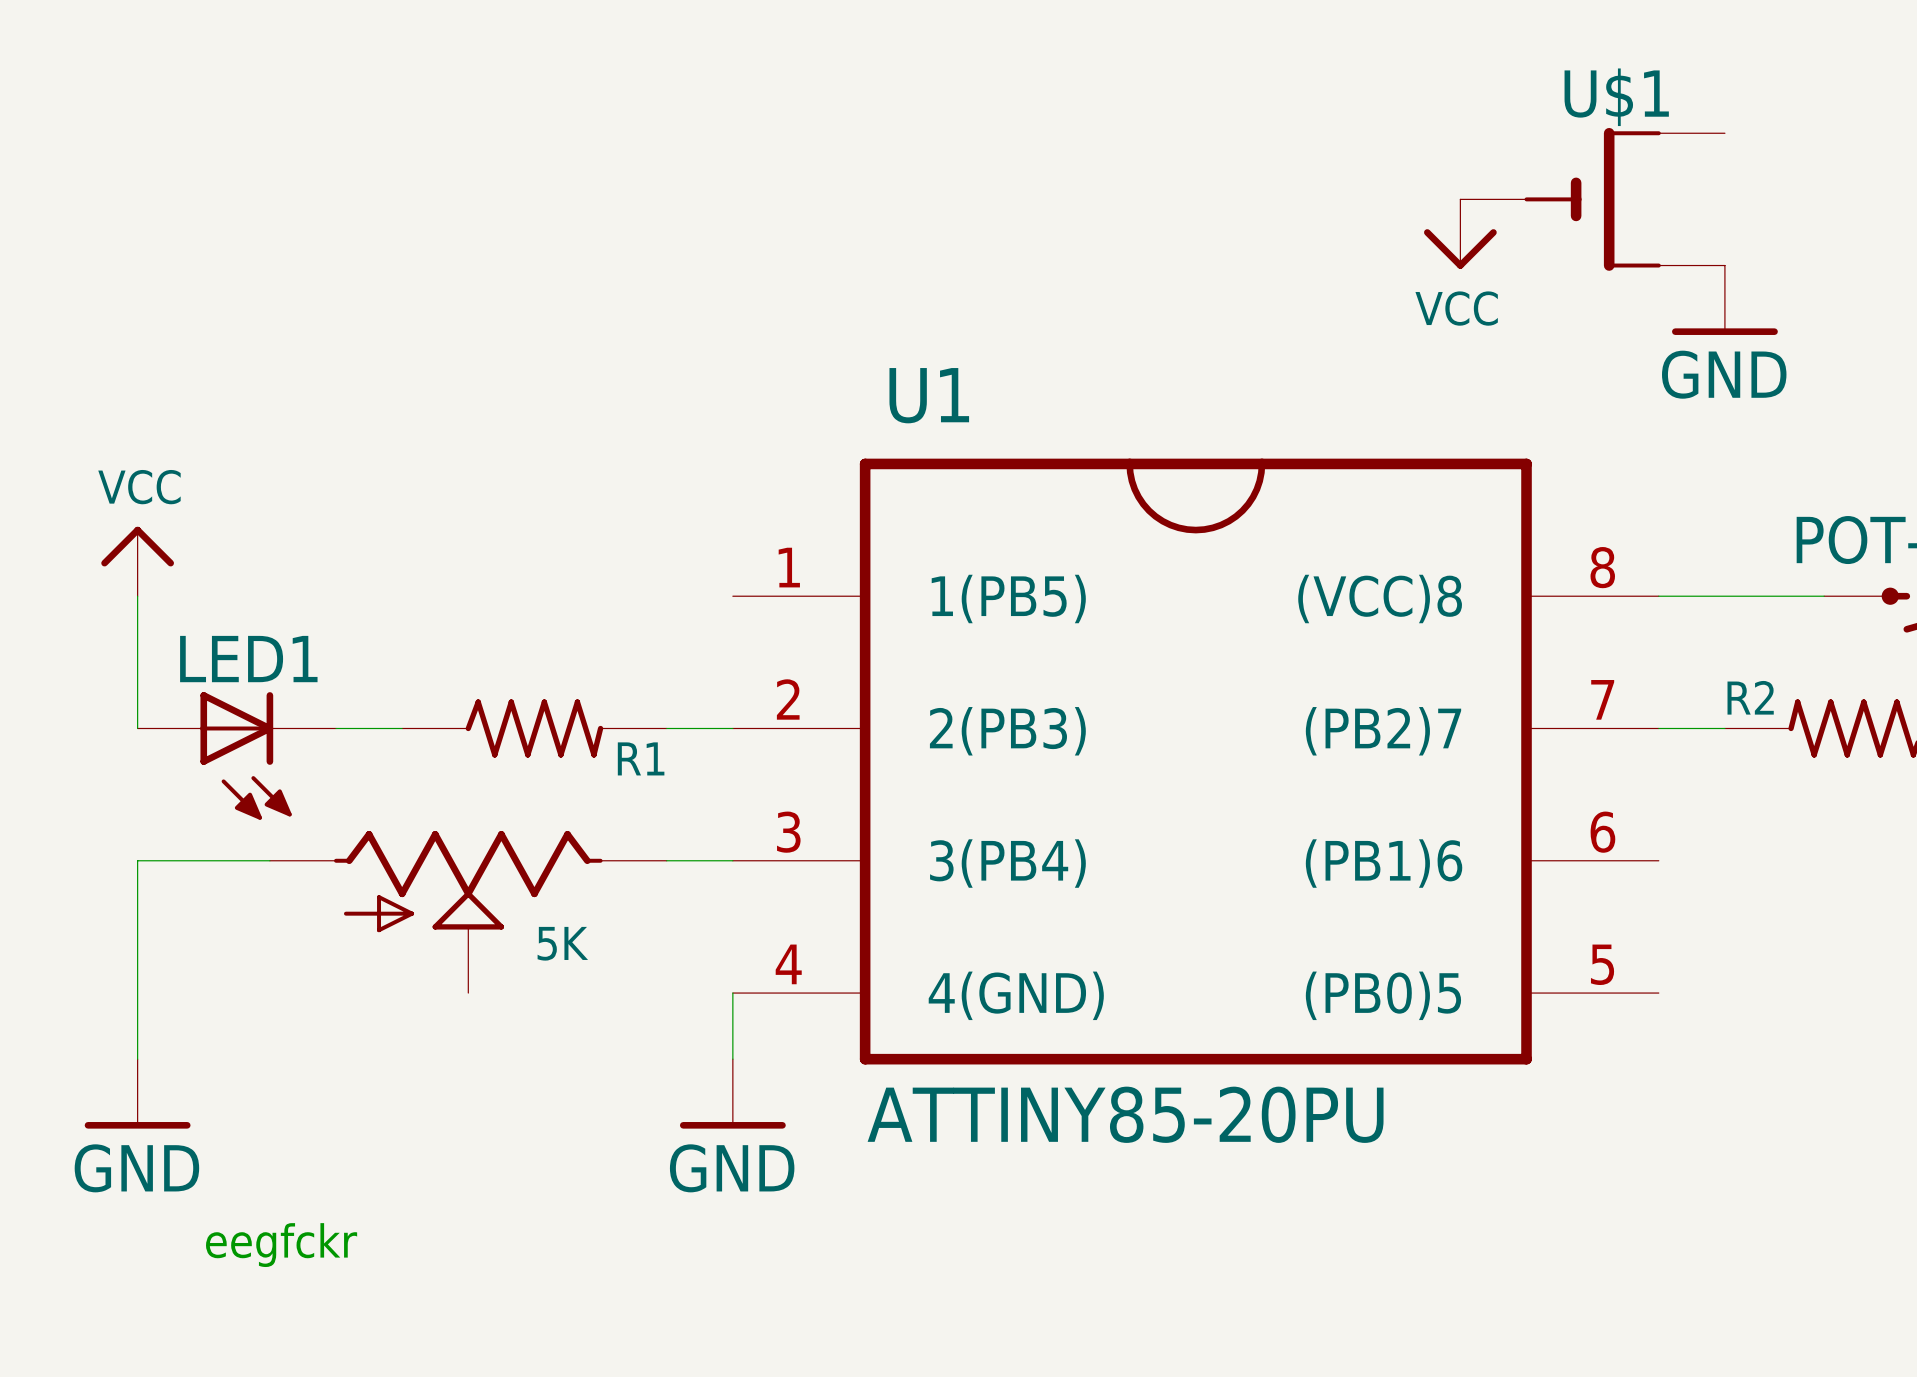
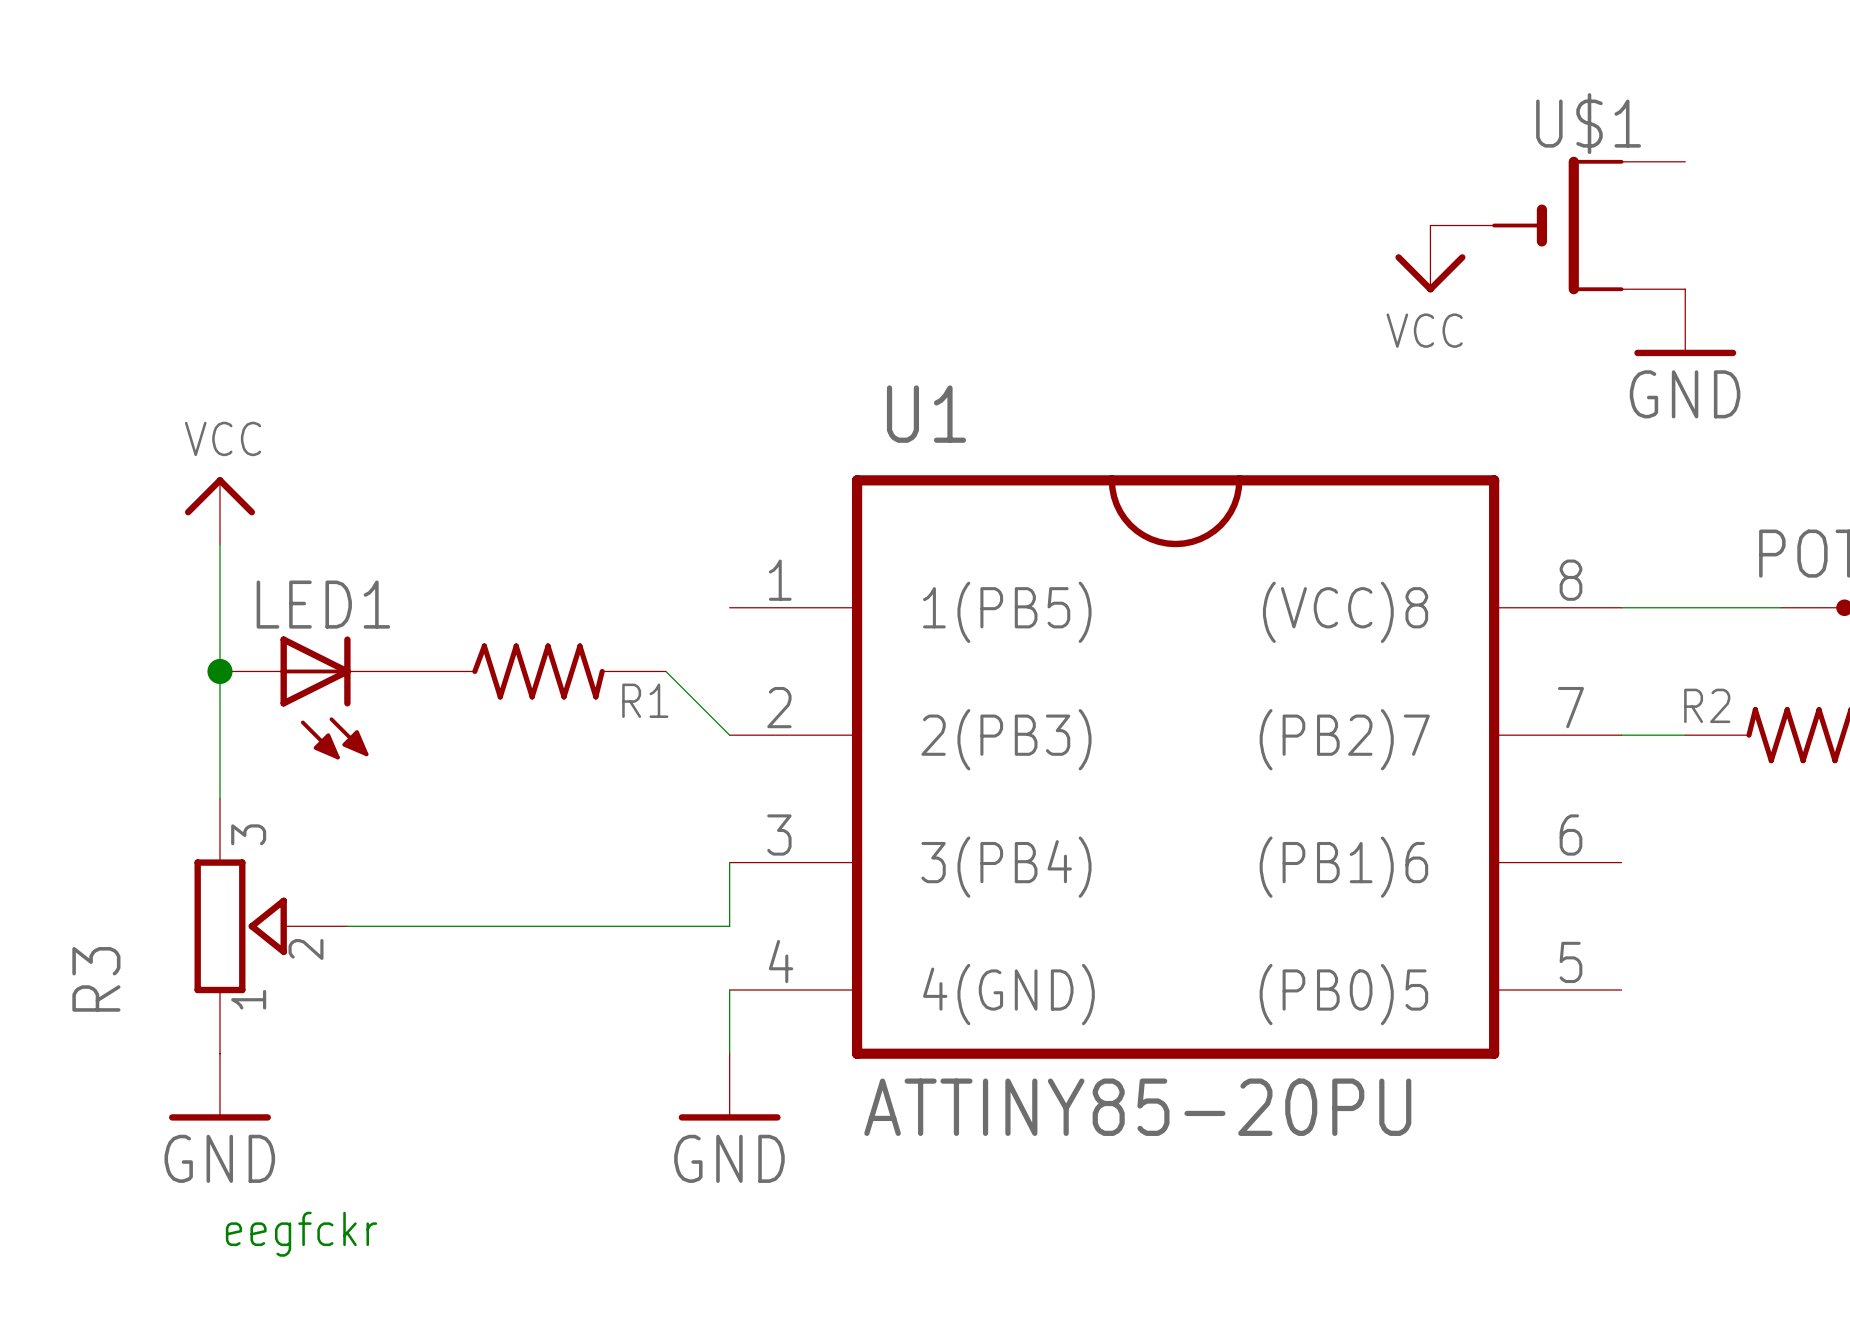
wire: none -> (219, 544) (219, 798)
power symbol position: VCC (137, 561) -> VCC (219, 510)
wire: (137, 596) (137, 728) -> none
junction: none -> (219, 671)
wire: (336, 728) (402, 728) -> none
R1 position: (534, 728) -> (538, 671)
wire: (666, 728) (732, 728) -> (665, 671) (729, 735)
LED1 position: (236, 755) -> (315, 697)
wire: (269, 860) (137, 860) (137, 1059) -> none
wire: (666, 860) (732, 860) -> (347, 926) (729, 926) (729, 862)
part: 5K (468, 912) -> none
R3: none -> (270, 926)
power symbol position: GND (137, 1093) -> GND (219, 1087)

